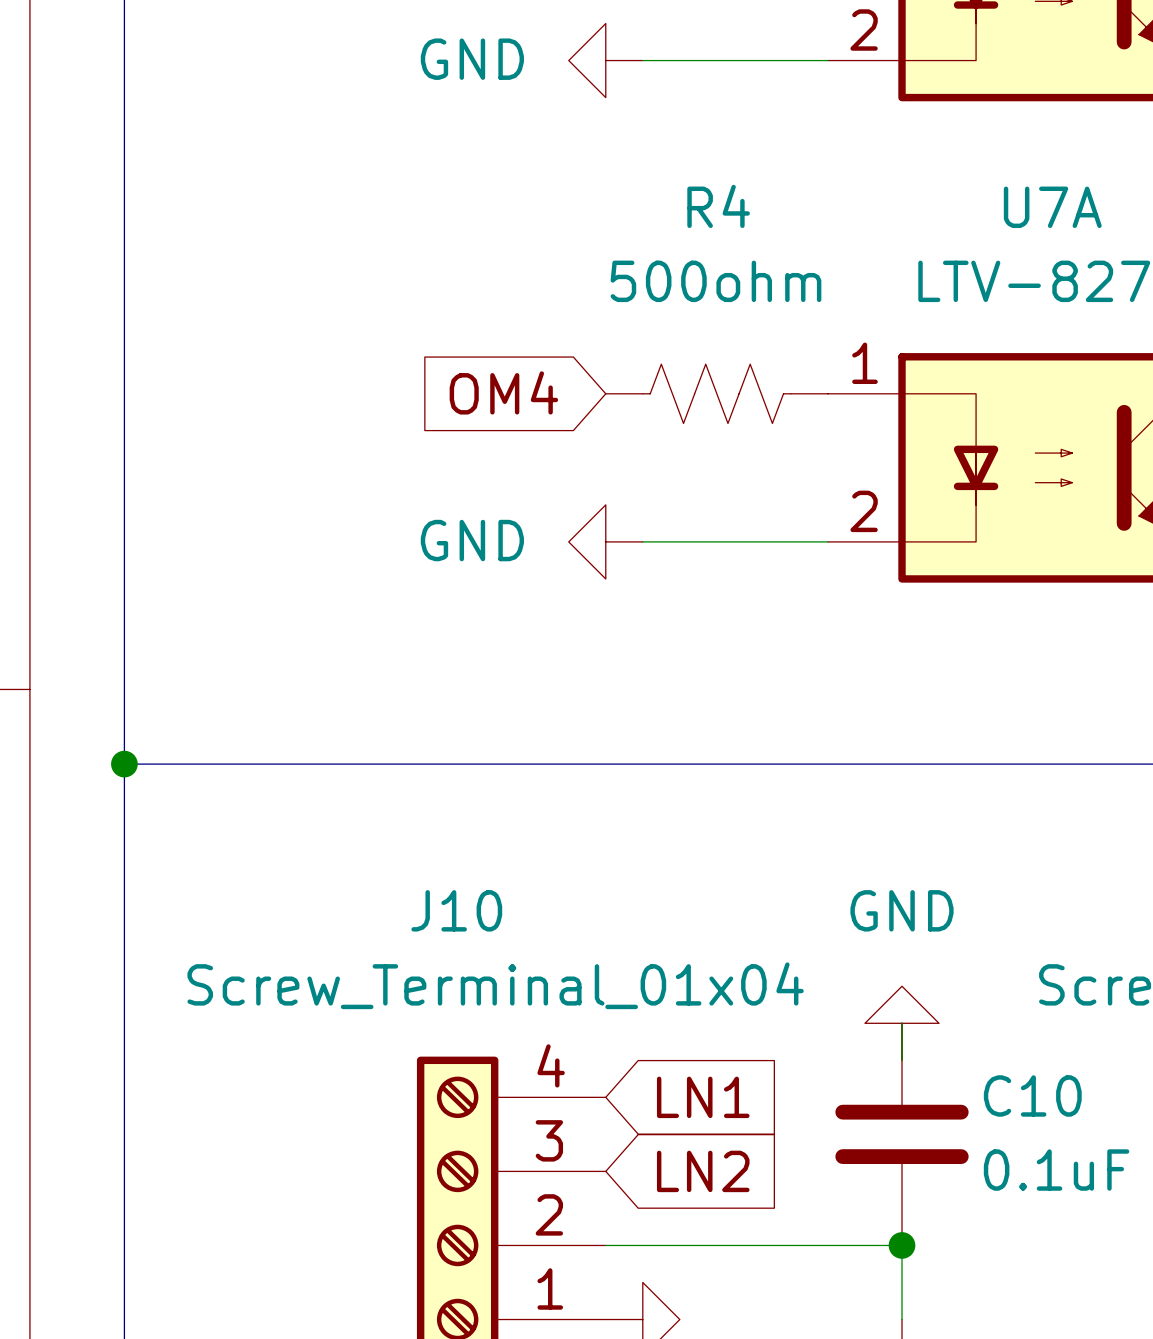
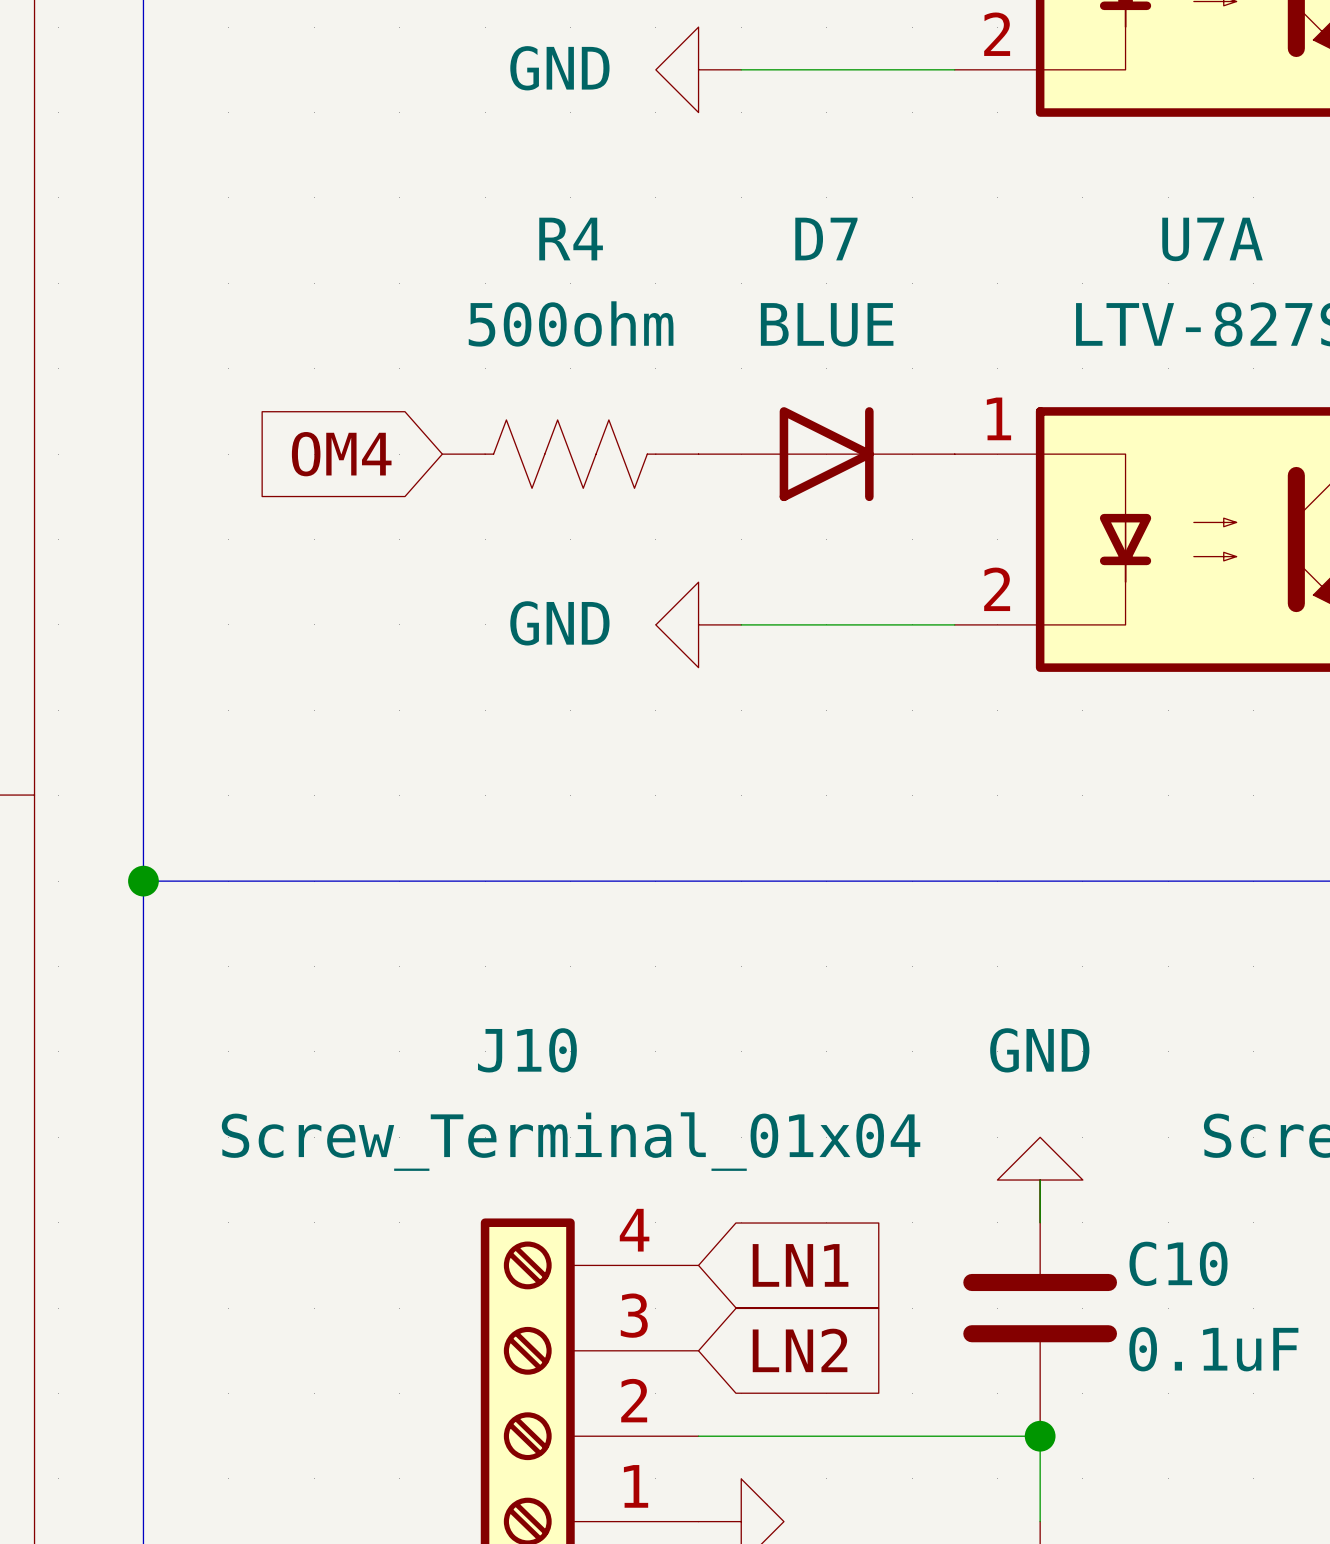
global label position: OM4 (503, 392) -> OM4 (341, 454)
R4 position: (716, 393) -> (570, 454)
D7: none -> BLUE (826, 454)

